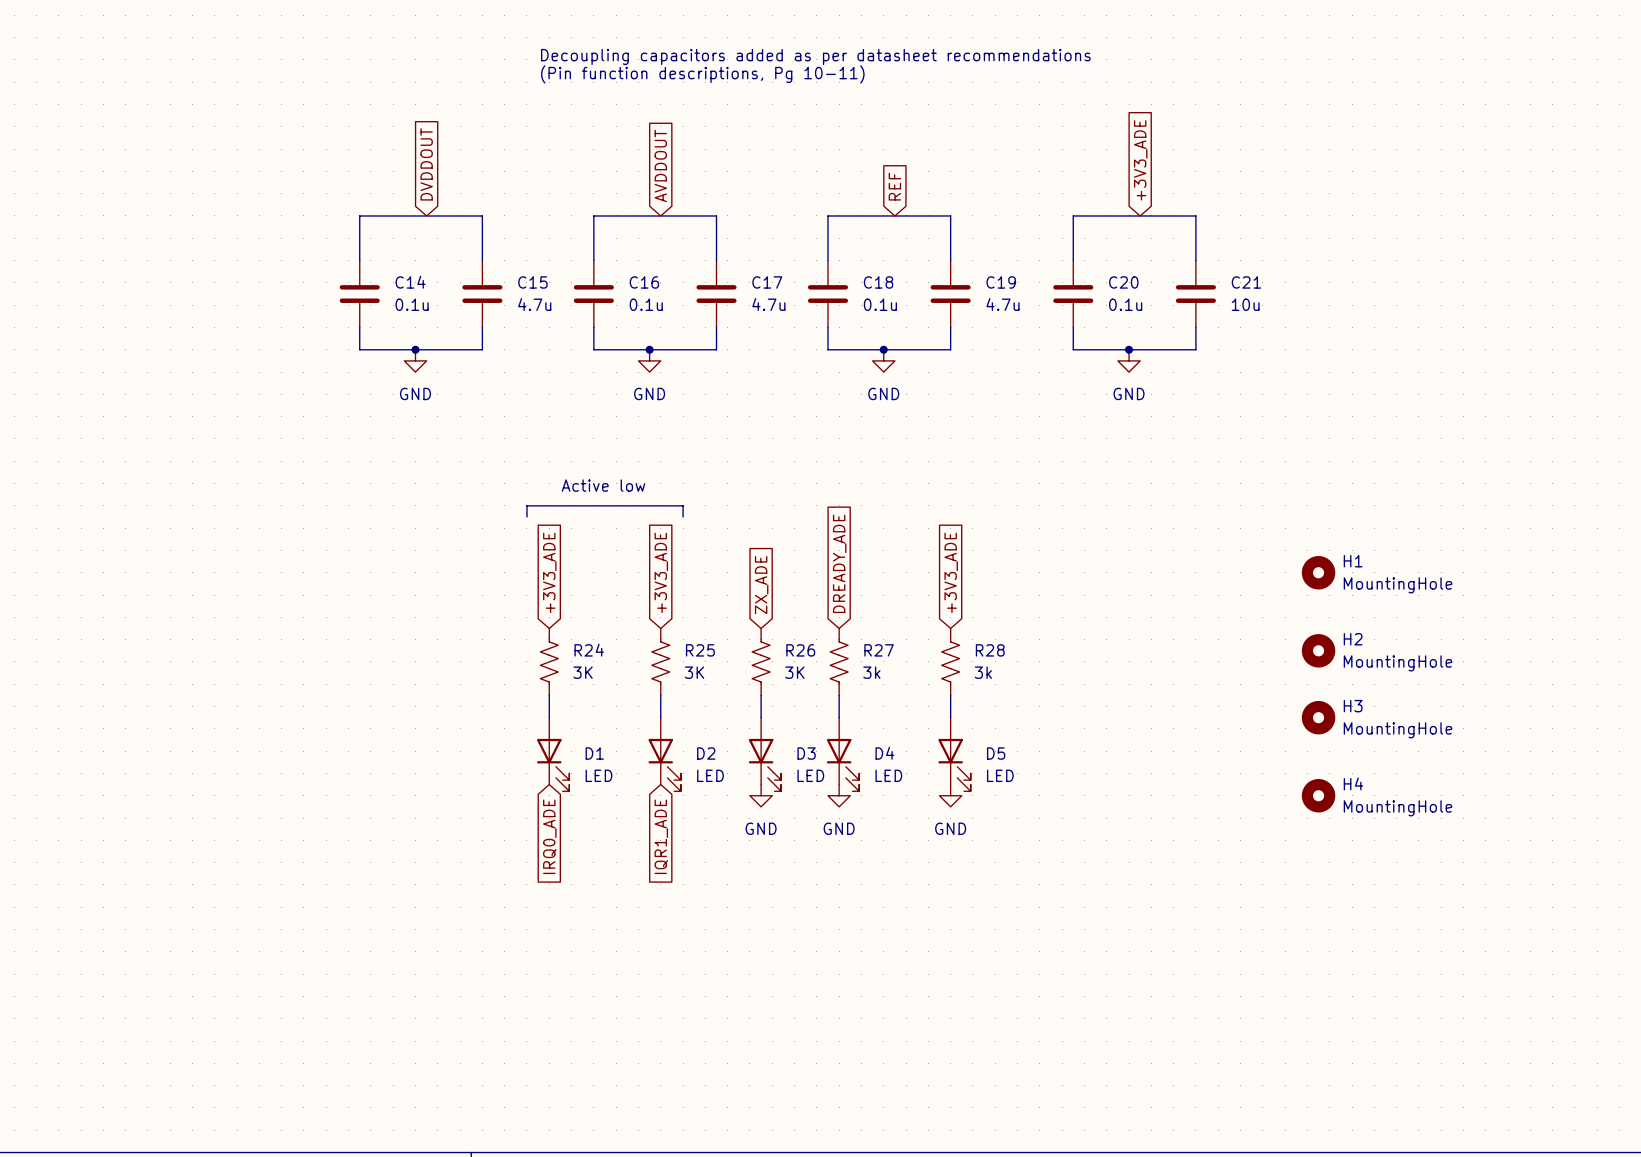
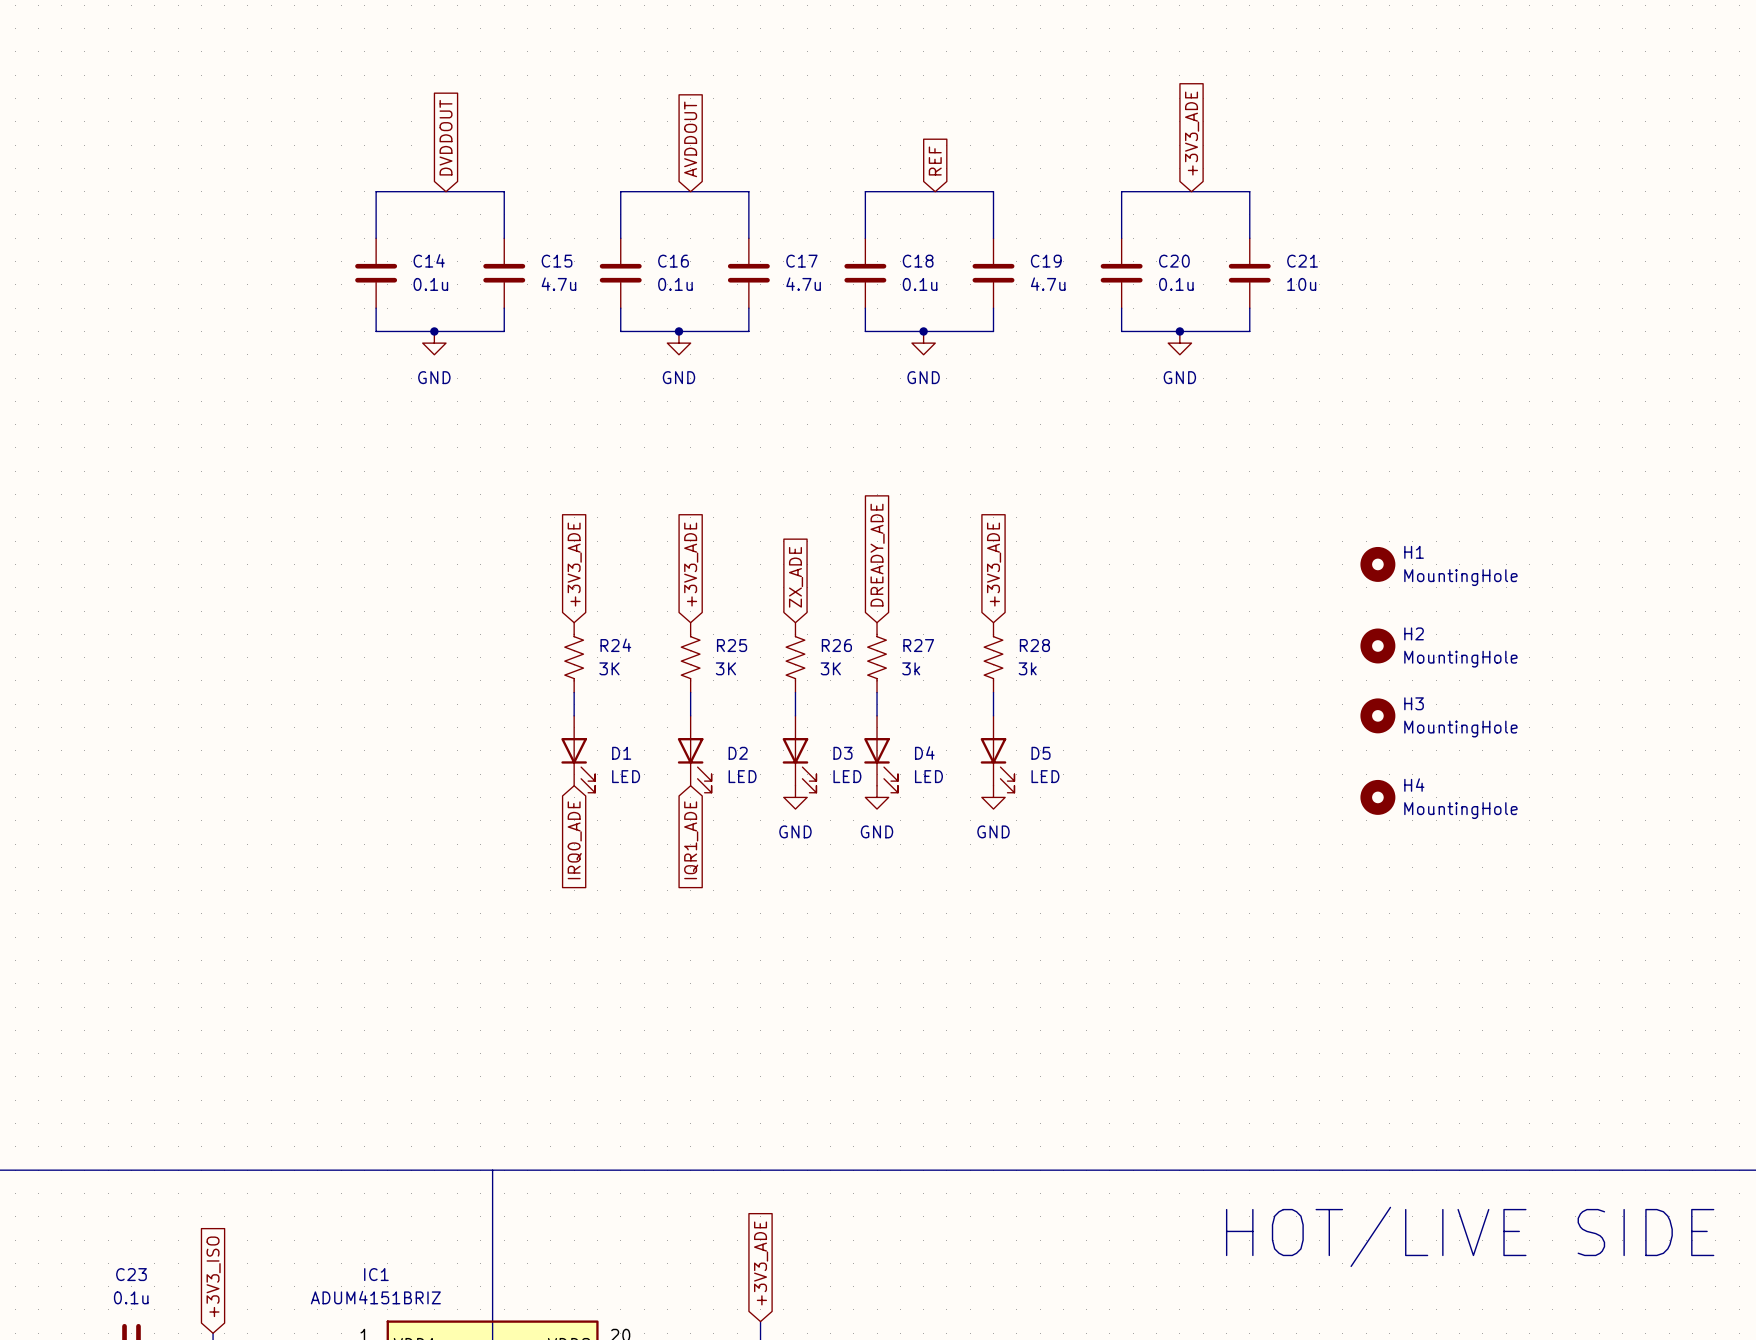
text: Decoupling capacitors added as per datasheet recommendations (815, 56) -> none
text: (Pin function descriptions, Pg 10-11) (702, 74) -> none
text: Active low (603, 485) -> none
line: (526, 517) (526, 505) (683, 505) (683, 517) -> none

